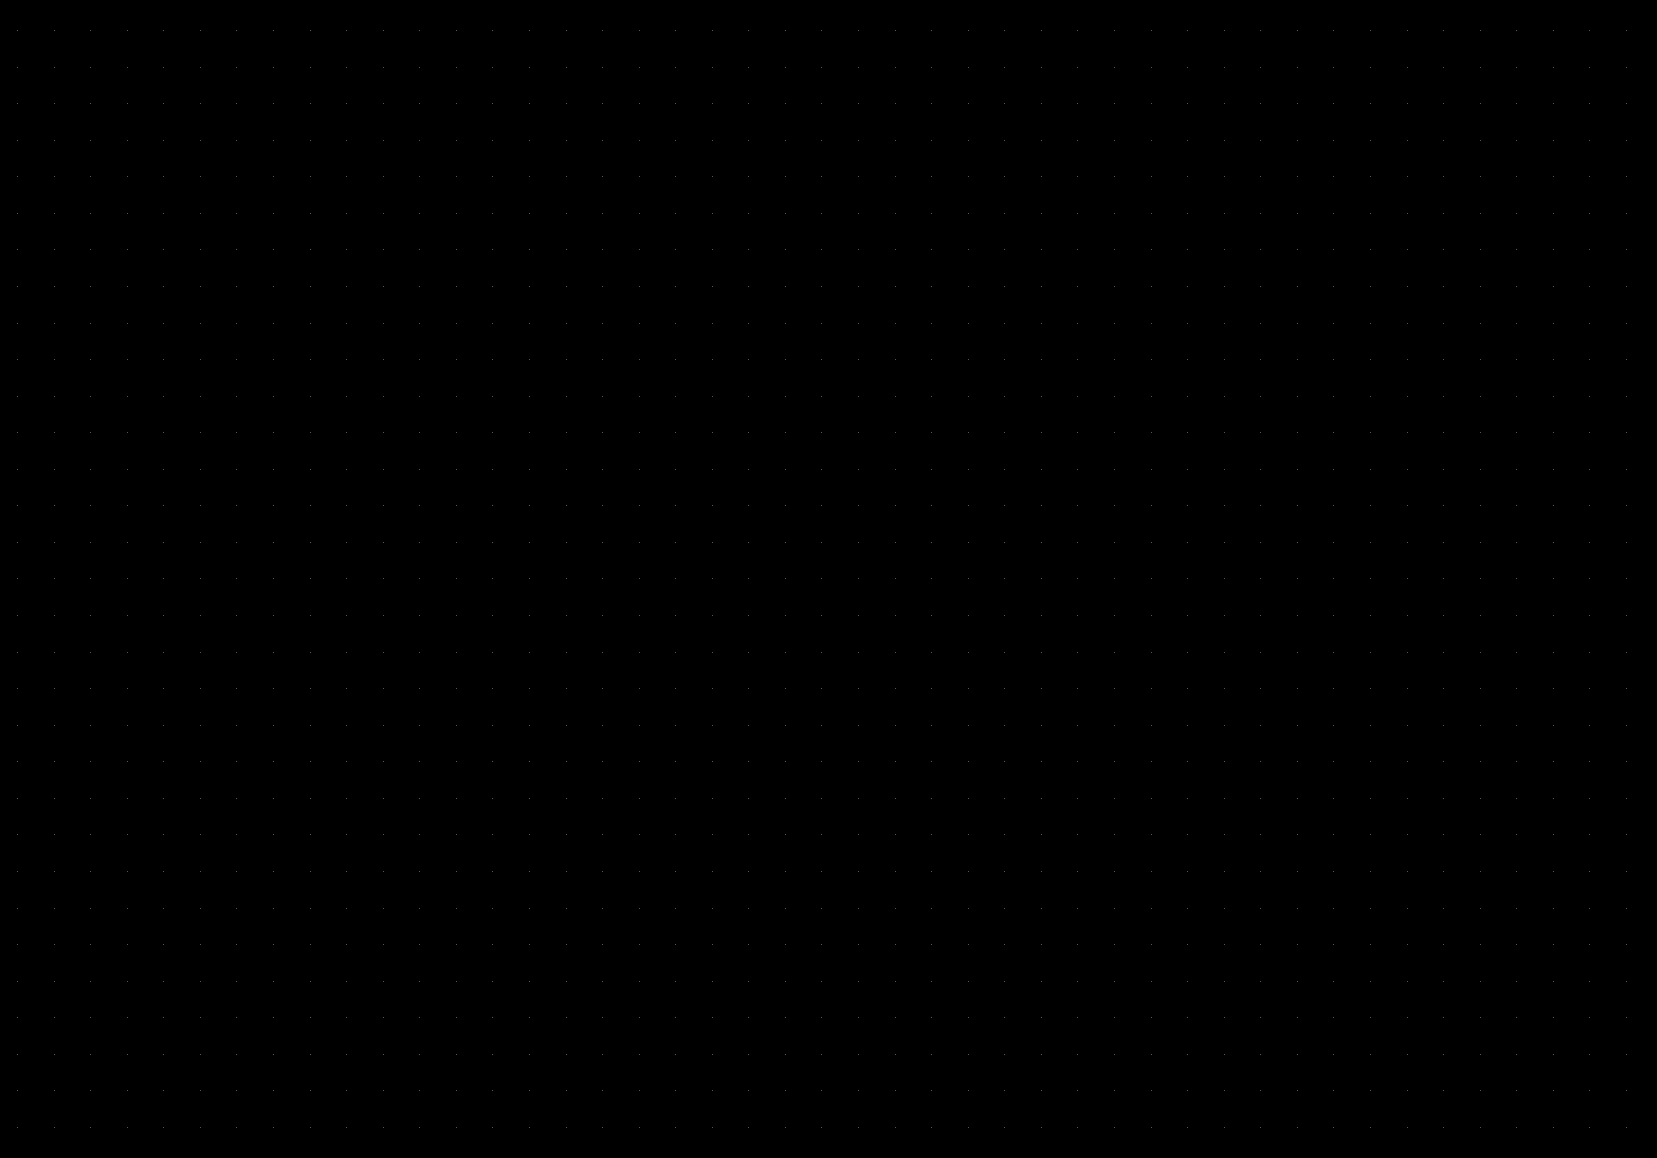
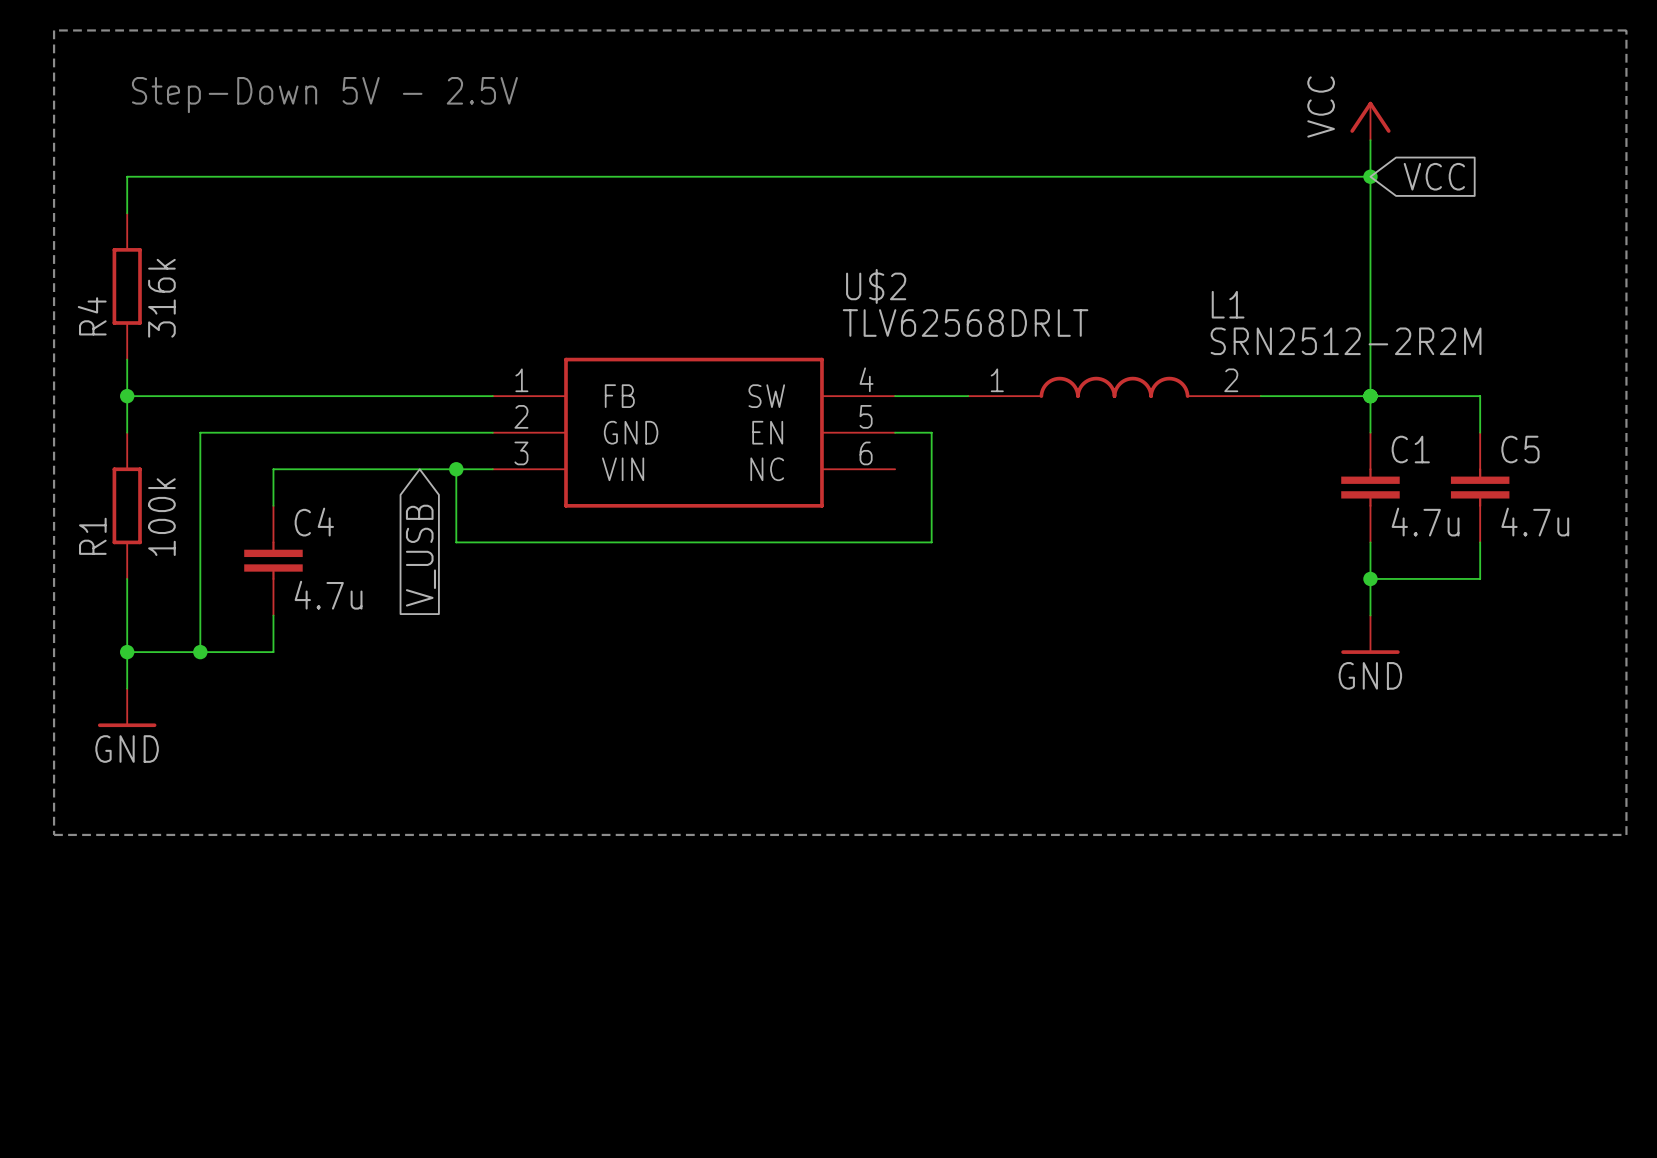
line: none -> (54, 30) (54, 834) (1626, 834) (1626, 30) (54, 30)
text: none -> Step-Down 5V - 2.5V (324, 95)
power symbol: none -> VCC (1370, 120)
wire: none -> (1370, 140) (1370, 432)
wire: none -> (1370, 176) (127, 176) (127, 213)
junction: none -> (1370, 176)
global label: none -> VCC (1434, 176)
R4: none -> 316k (127, 286)
wire: none -> (127, 359) (127, 432)
L1: none -> SRN2512-2R2M (1114, 387)
wire: none -> (127, 396) (492, 396)
junction: none -> (127, 396)
wire: none -> (895, 396) (968, 396)
wire: none -> (1260, 396) (1480, 396) (1480, 432)
junction: none -> (1370, 396)
wire: none -> (492, 432) (200, 432) (200, 652)
U$2: none -> TLV62568DRLT (693, 432)
wire: none -> (895, 432) (931, 432) (931, 542) (456, 542) (456, 469)
junction: none -> (456, 469)
wire: none -> (492, 469) (273, 469) (273, 505)
C1: none -> 4.7u (1370, 487)
C5: none -> 4.7u (1480, 487)
R1: none -> 100k (127, 505)
wire: none -> (1370, 542) (1370, 615)
wire: none -> (1480, 542) (1480, 578) (1370, 578)
global label: none -> V_USB (420, 555)
C4: none -> 4.7u (273, 560)
wire: none -> (127, 578) (127, 688)
junction: none -> (1370, 578)
wire: none -> (273, 615) (273, 652) (127, 652)
power symbol: none -> GND (1370, 634)
junction: none -> (127, 652)
junction: none -> (200, 652)
power symbol: none -> GND (127, 707)

